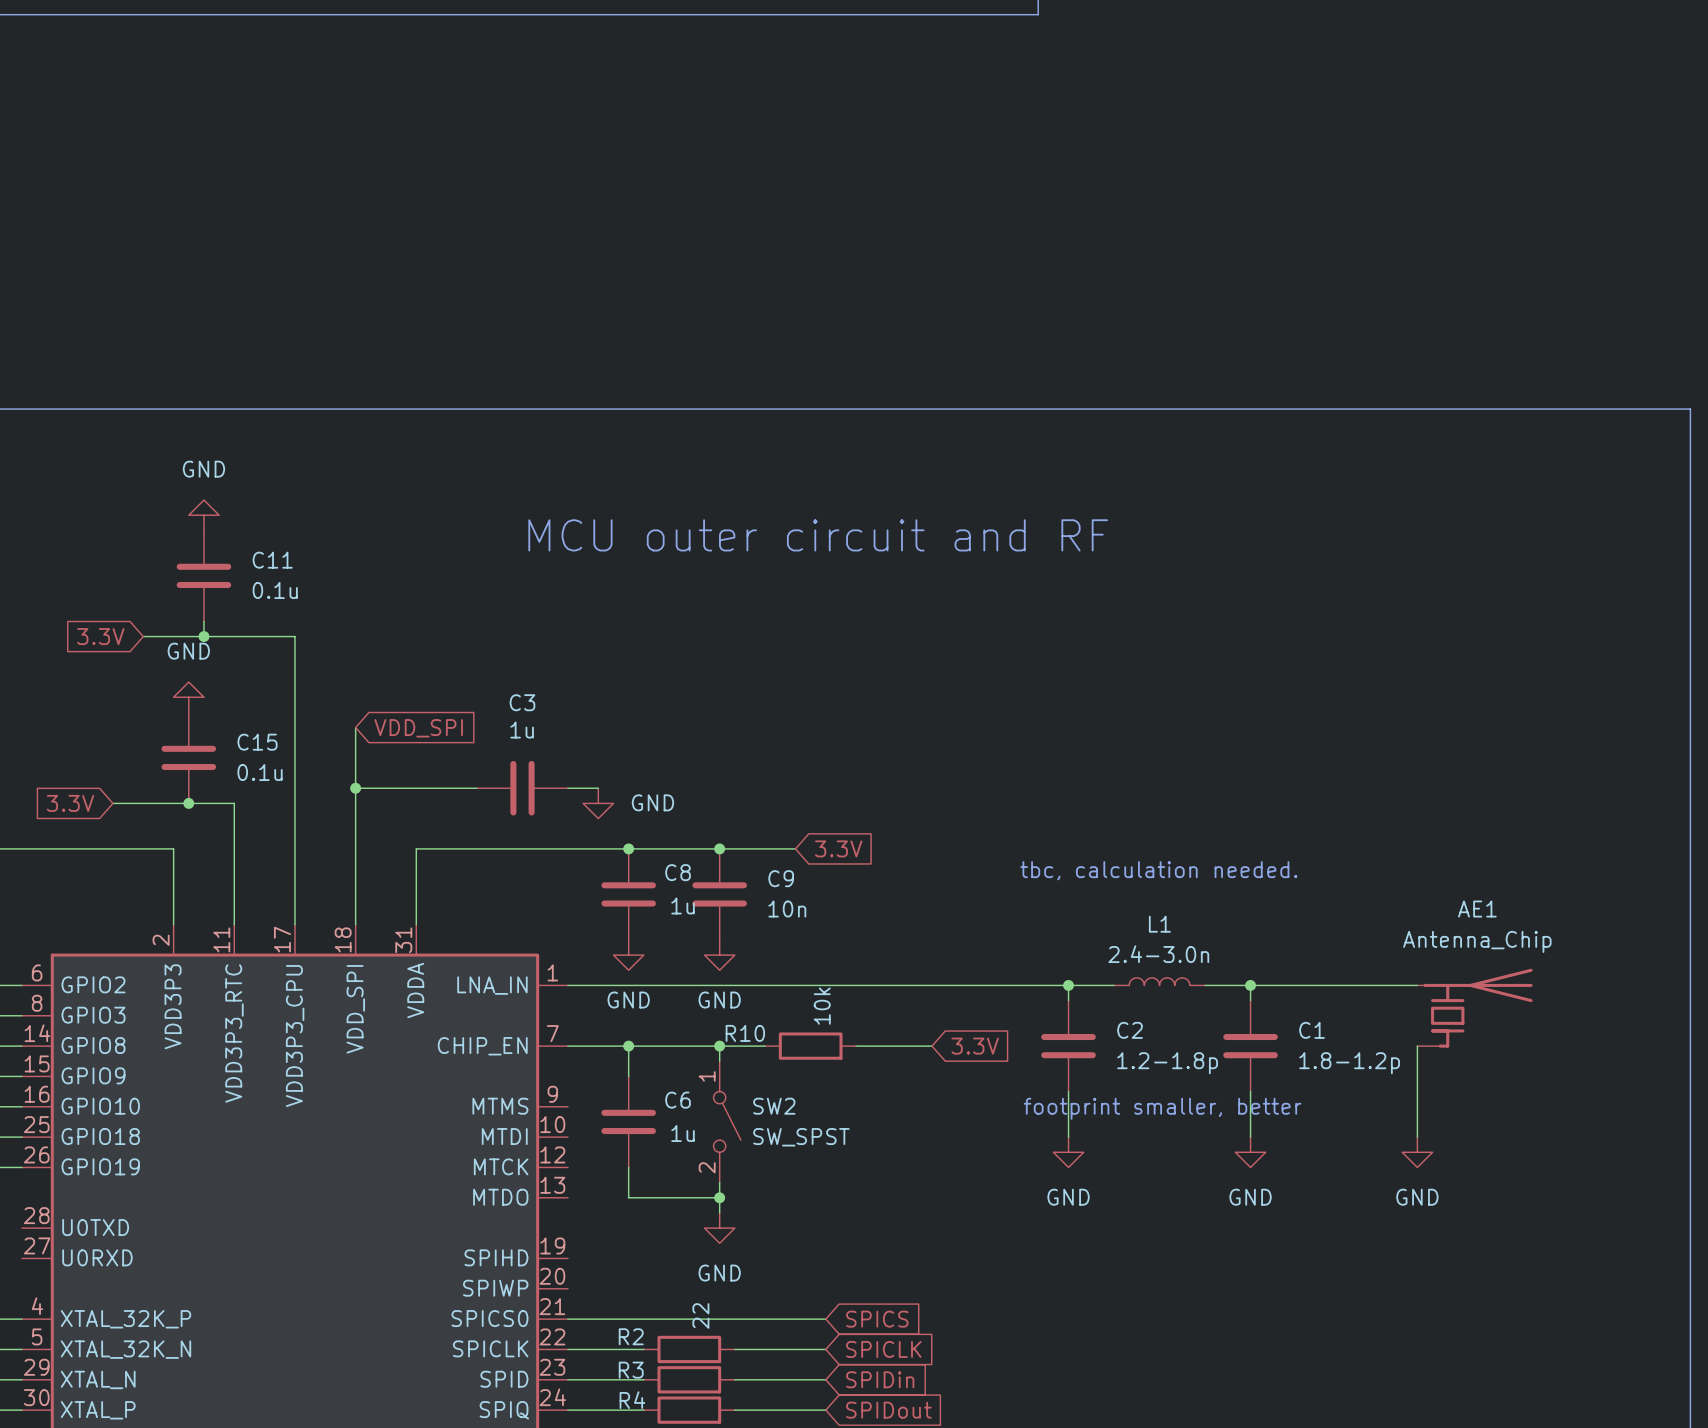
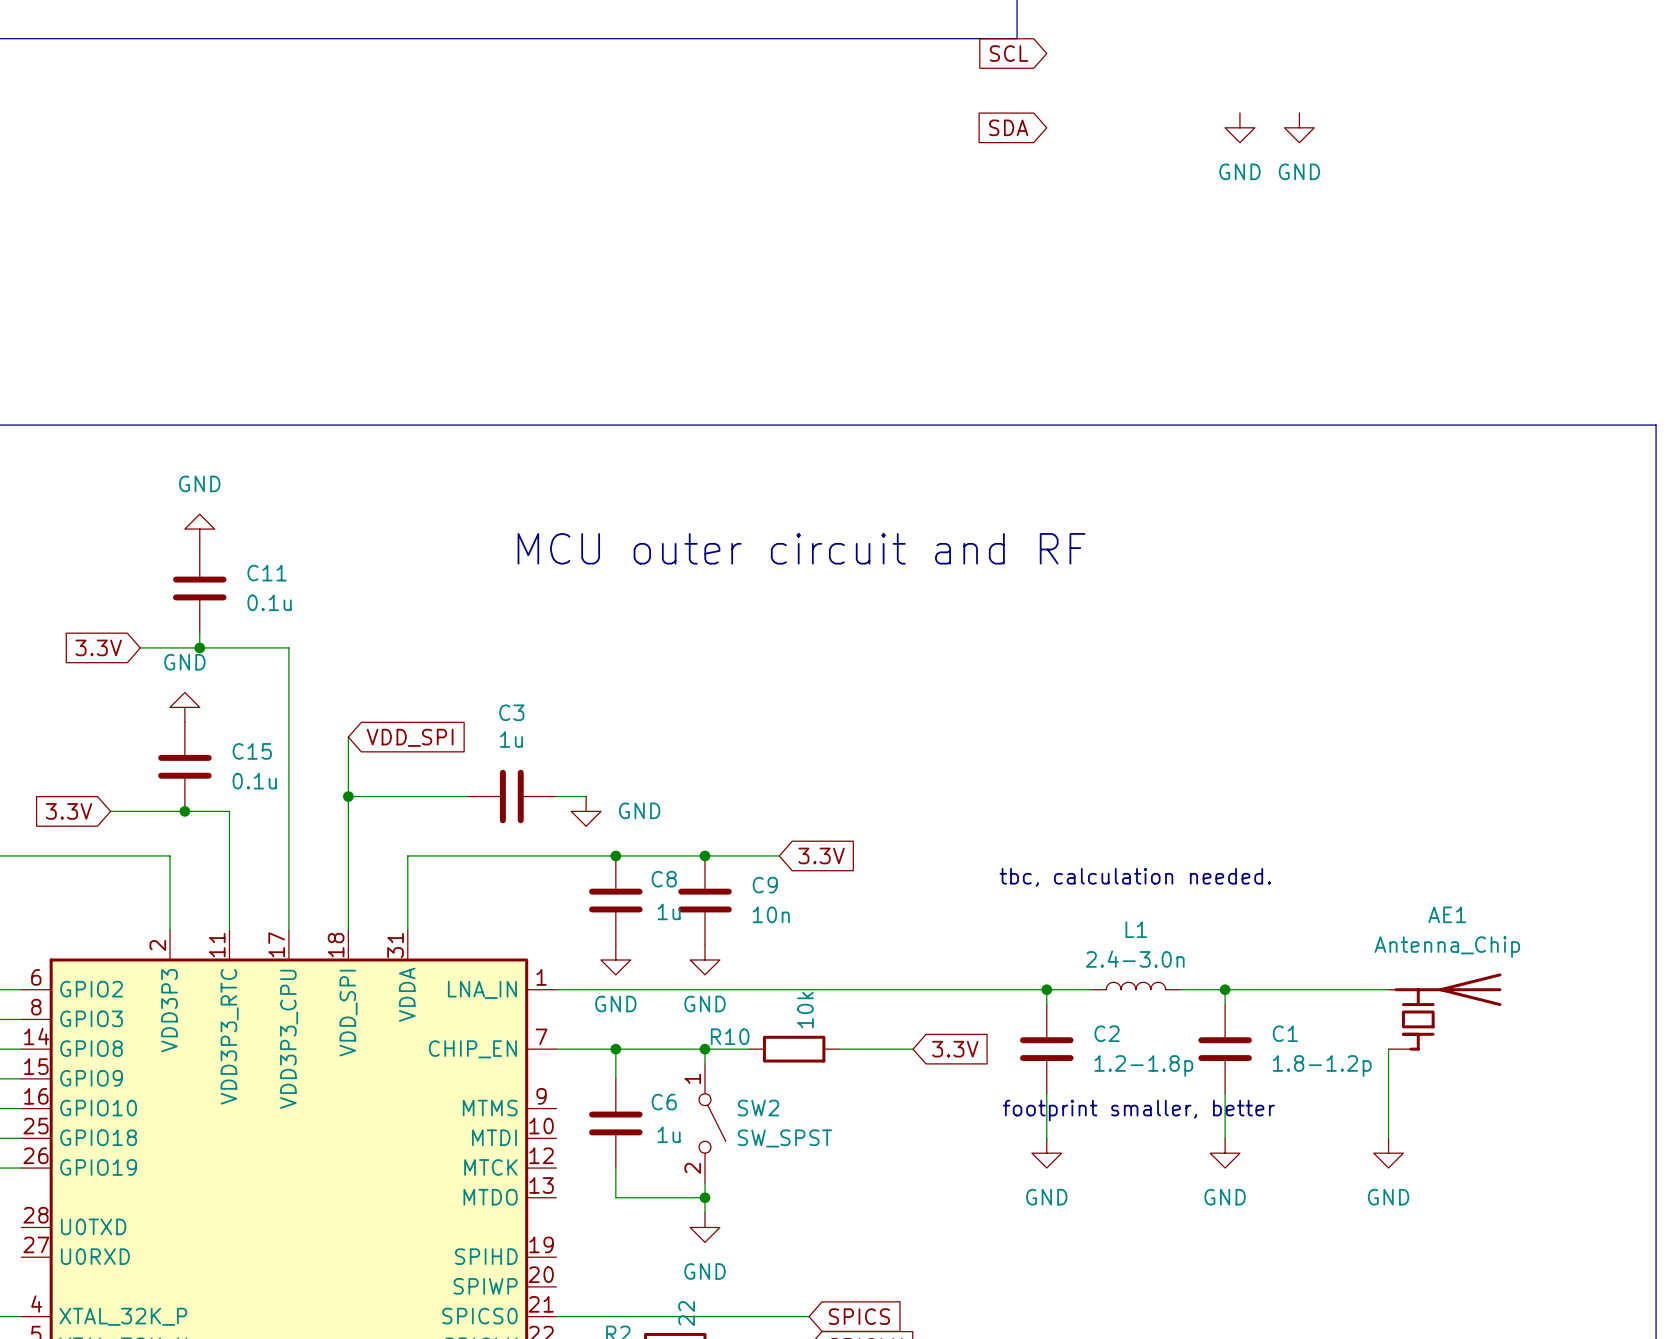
global label: none -> SCL (1009, 53)
global label: none -> SDA (1008, 127)
power symbol: none -> GND (1239, 127)
power symbol: none -> GND (1299, 127)

